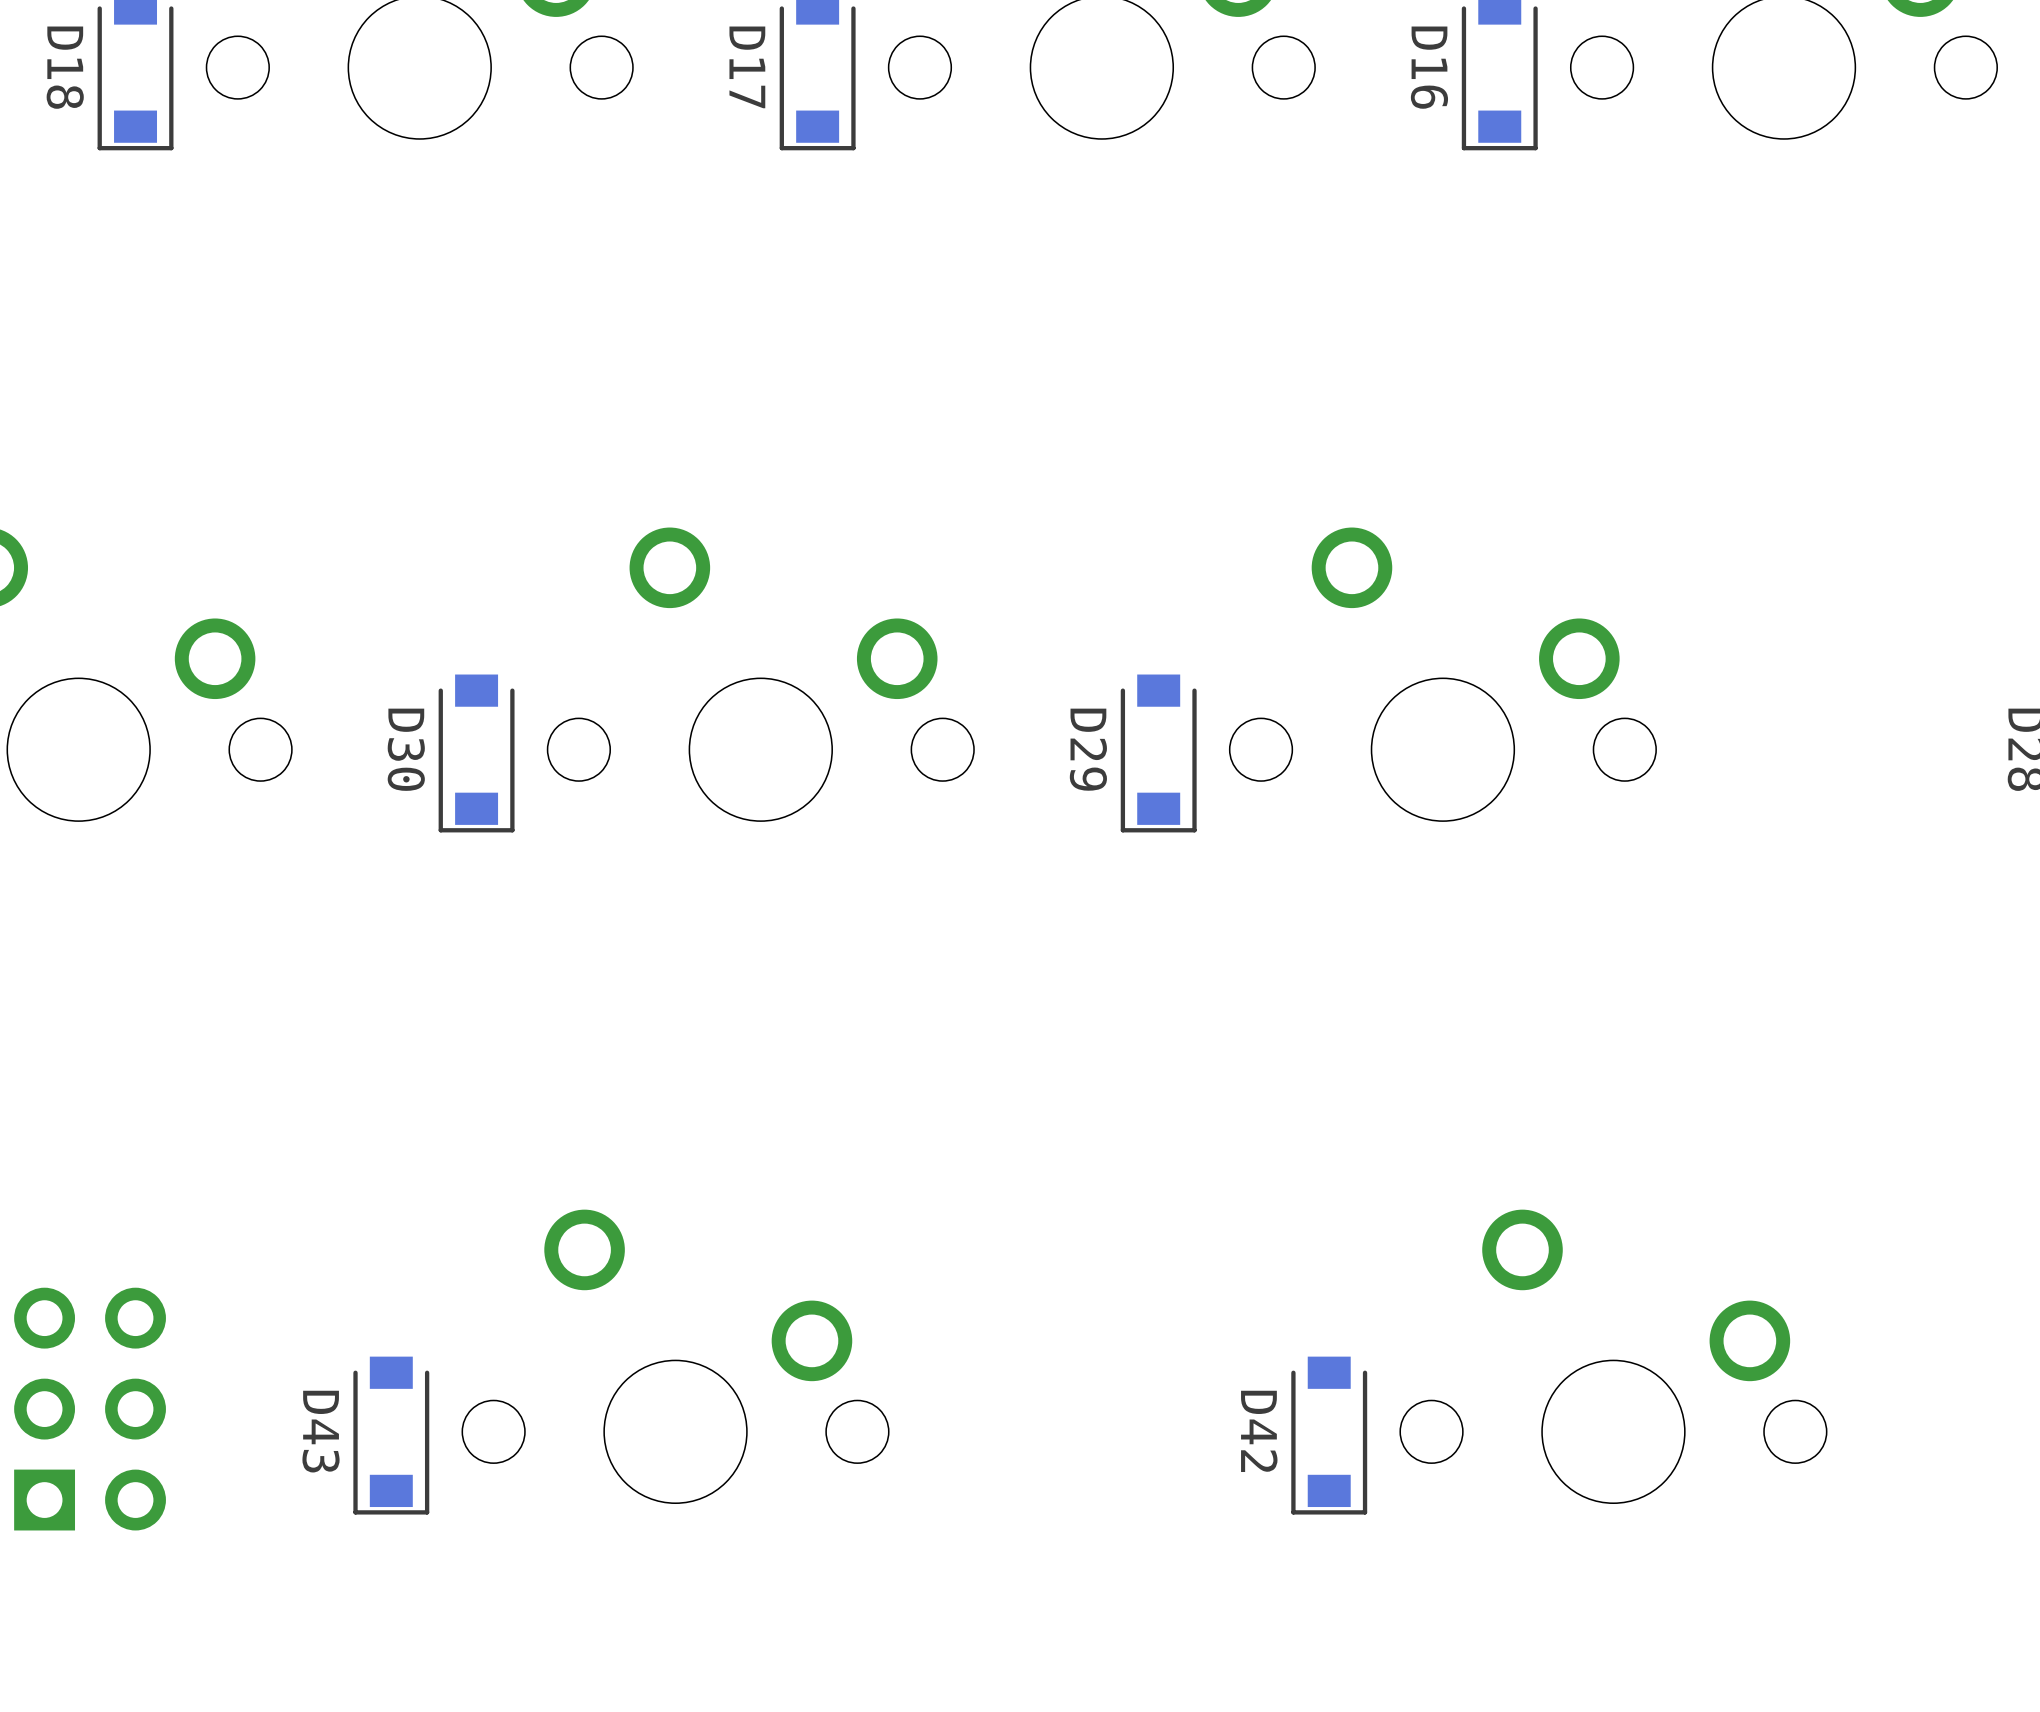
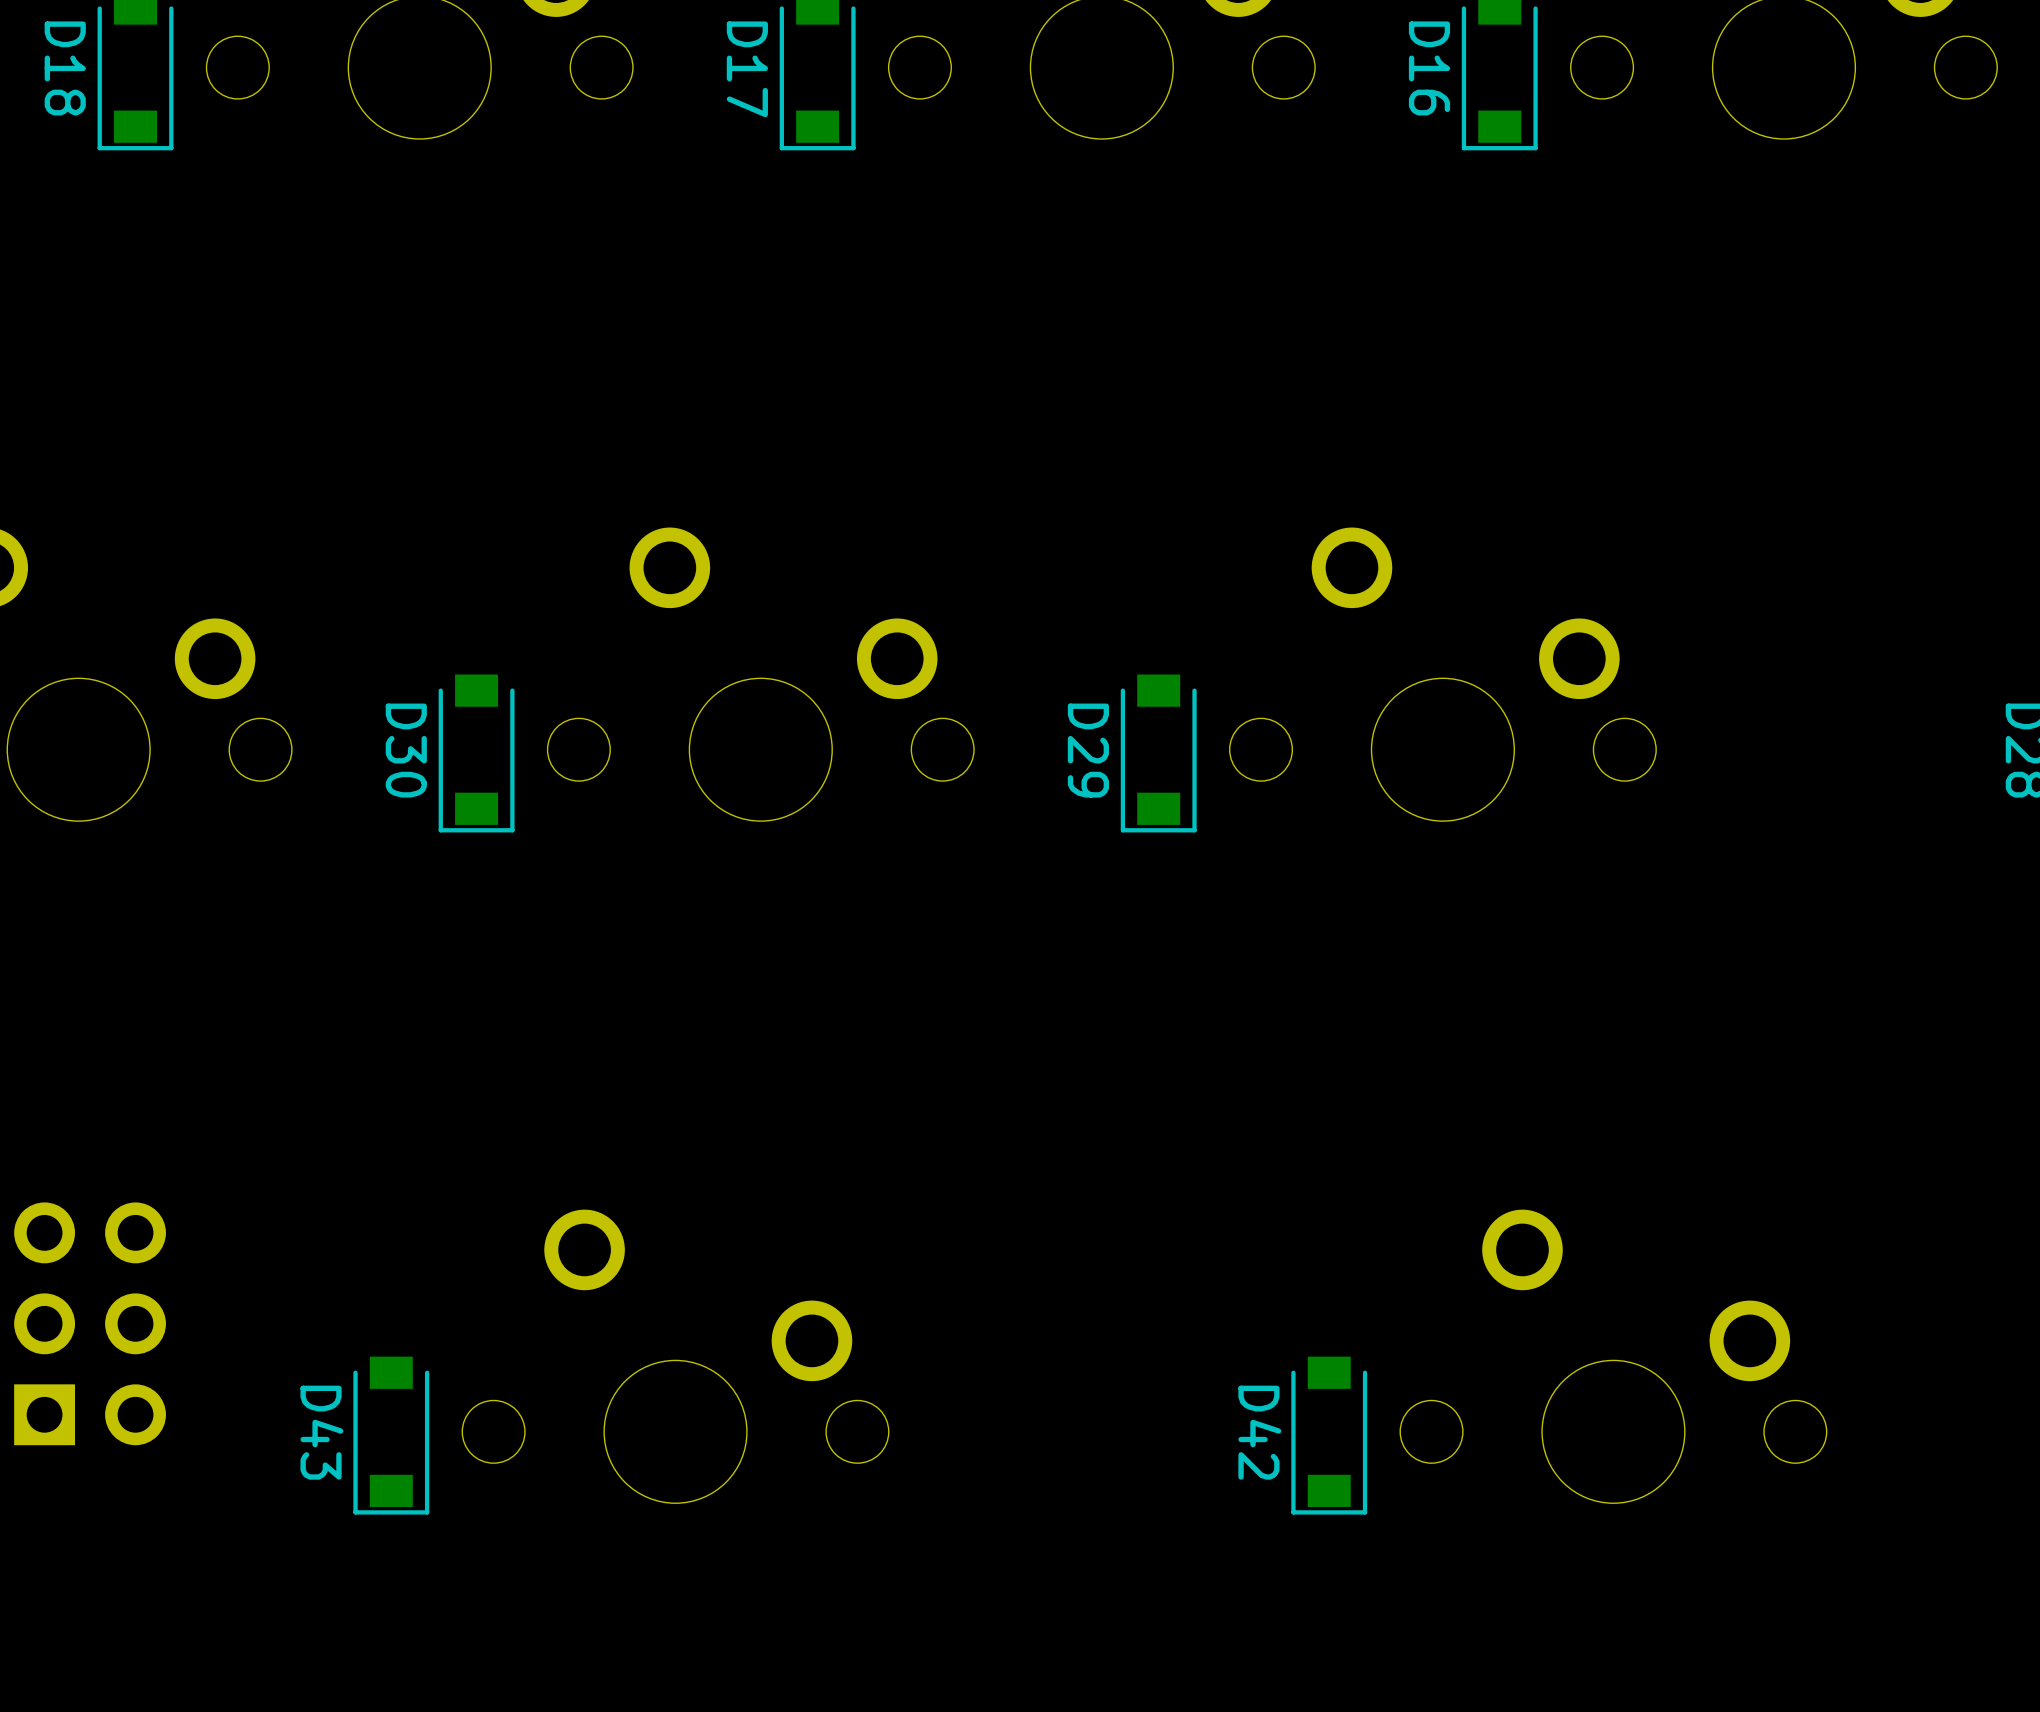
part position: (90, 1409) -> (90, 1323)

